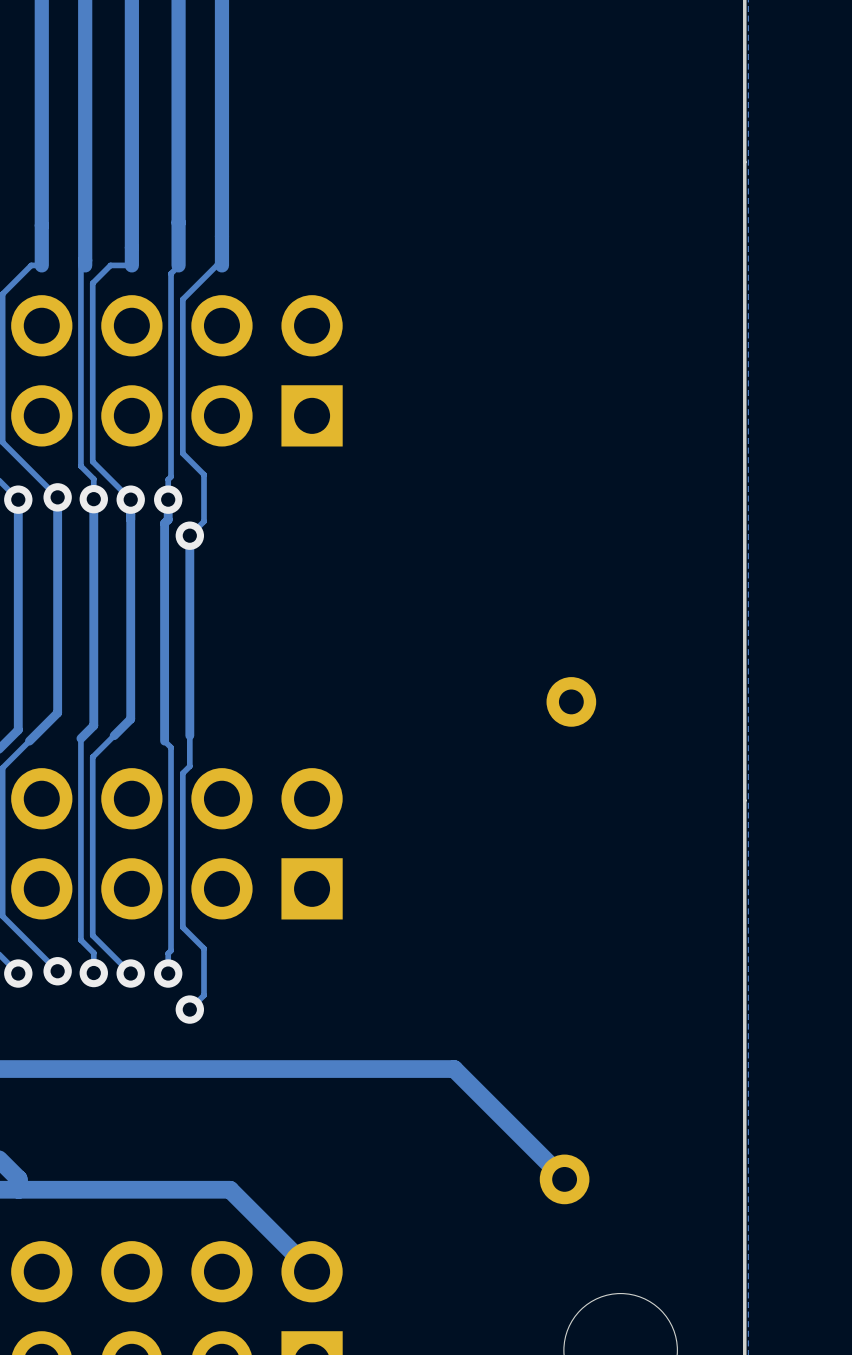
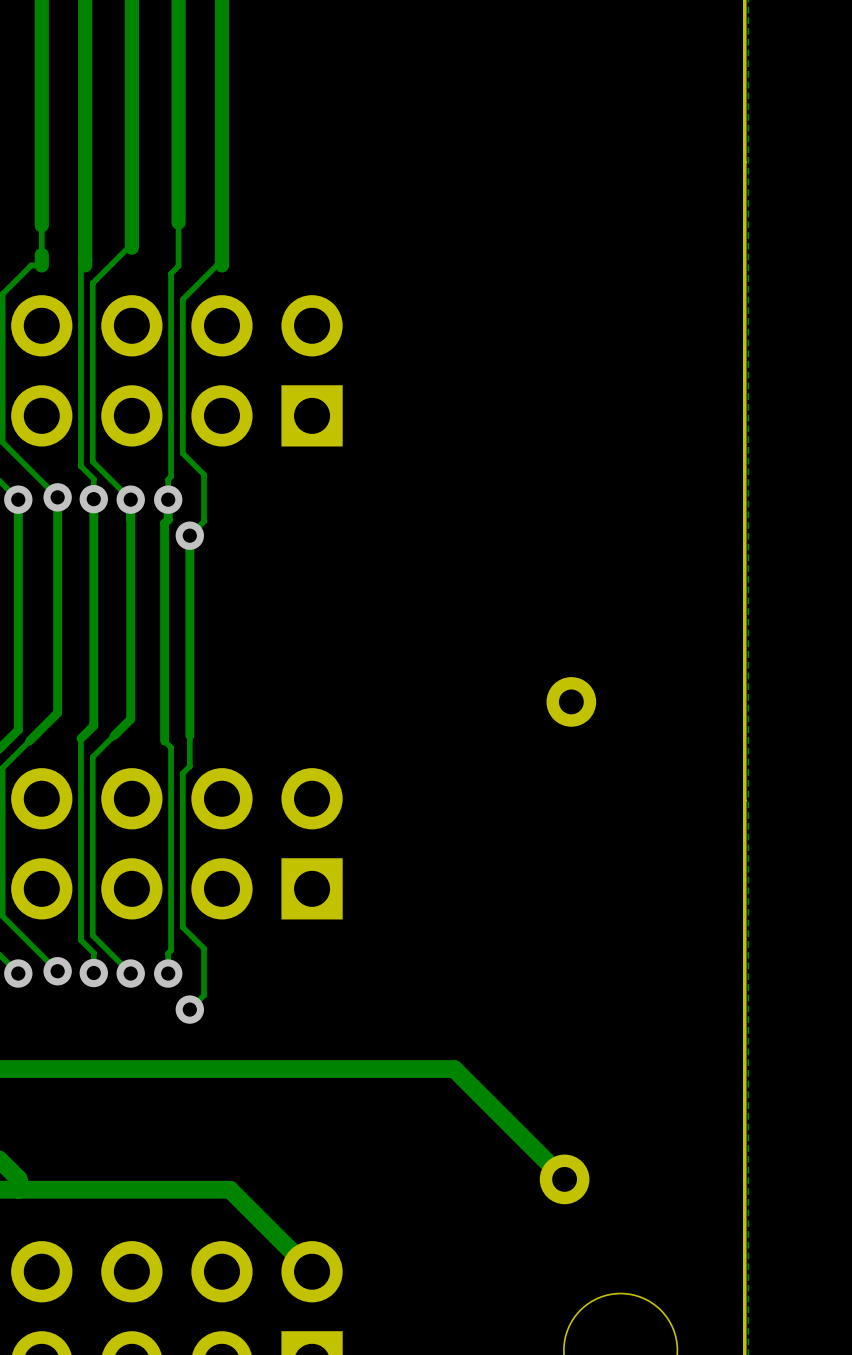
track width: thick (178, 222) (178, 265) -> thin (178, 222) (178, 265)
track width: thick (41, 225) (41, 254) -> thin (41, 225) (41, 254)
track: (131, 247) (131, 265) (110, 265) -> (128, 247) (110, 265)

